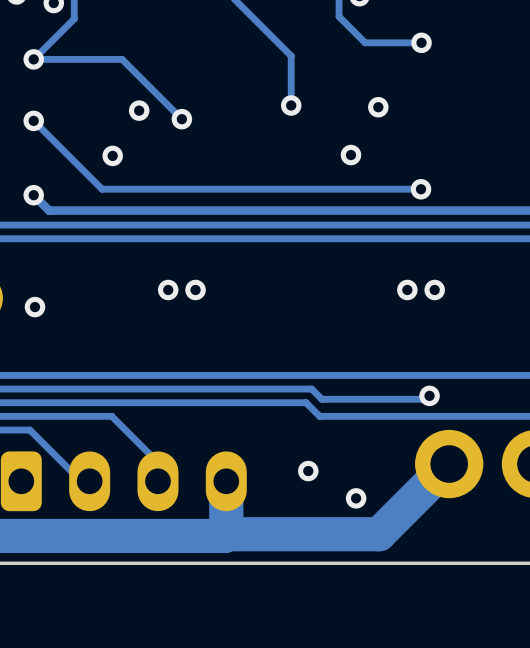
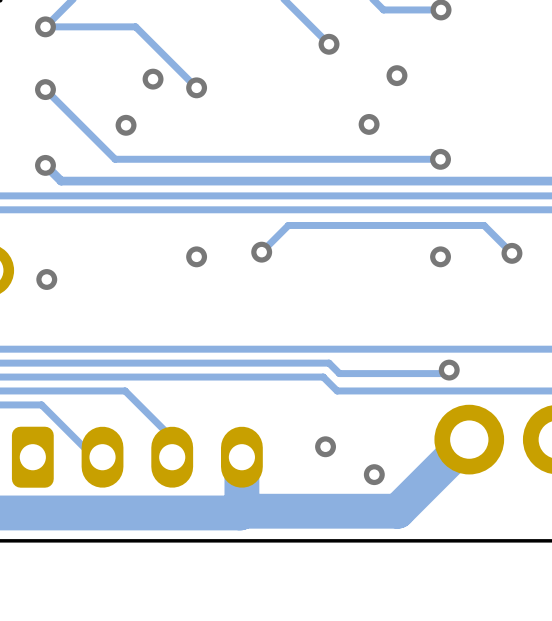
track: (291, 55) (291, 105) -> (308, 23) (329, 44)
via position: (291, 105) -> (329, 44)
track: none -> (261, 252) (288, 225) (484, 225) (511, 253)
via: none -> (261, 252)
via: none -> (511, 253)
via: none -> (196, 256)
via: none -> (440, 256)
via: (168, 289) -> none
via: (195, 289) -> none
via: (407, 289) -> none
via: (434, 289) -> none

